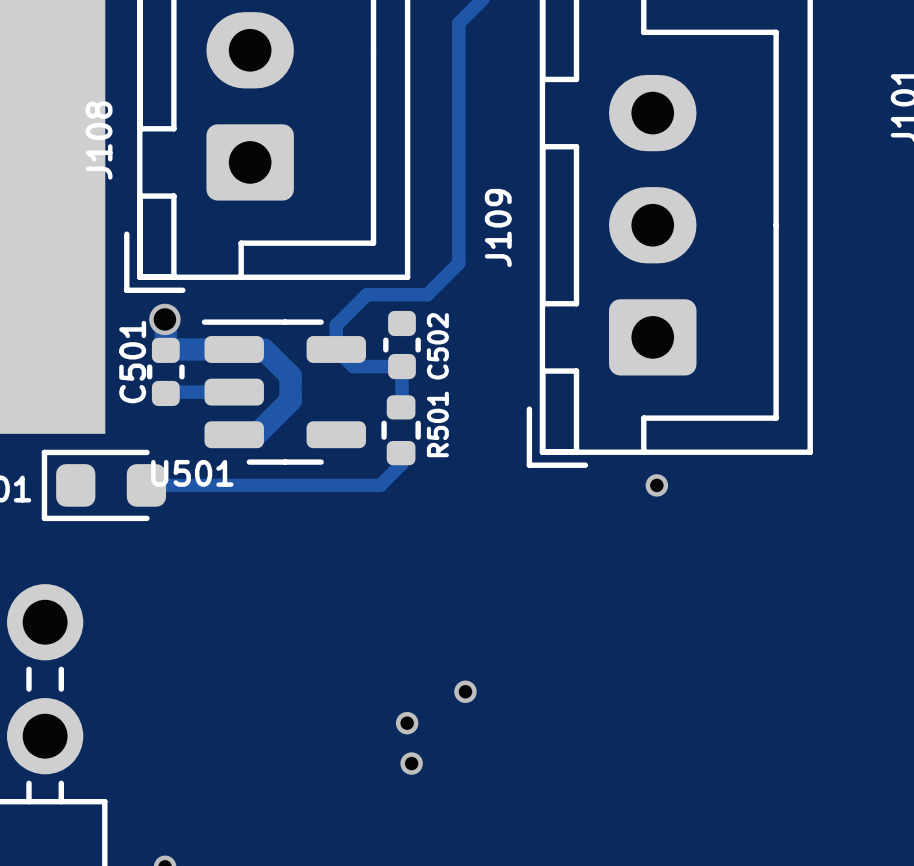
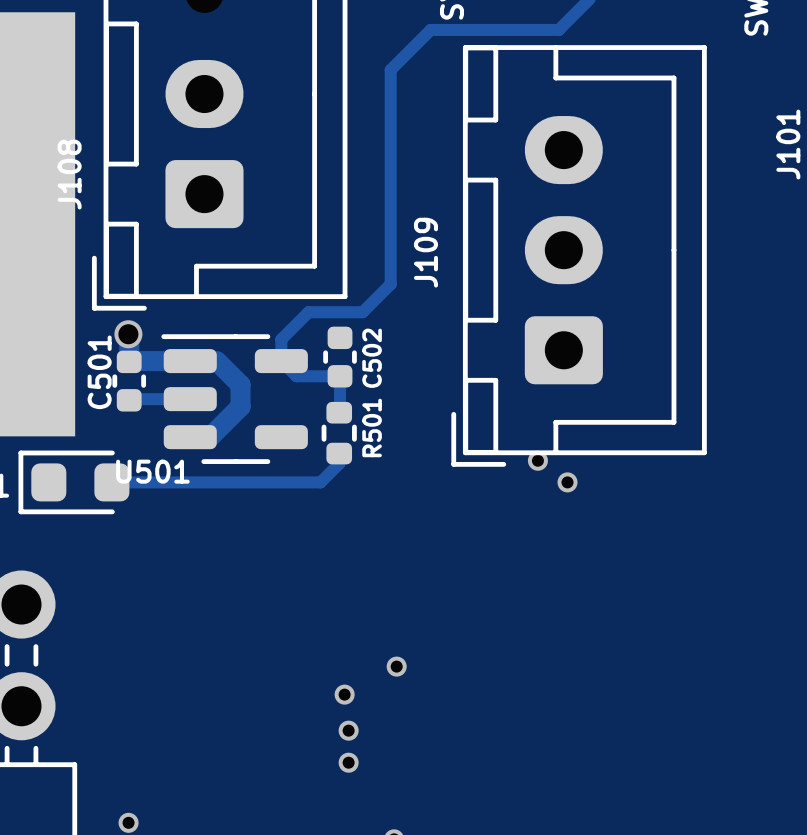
via: none -> (537, 460)
via: none -> (348, 762)

